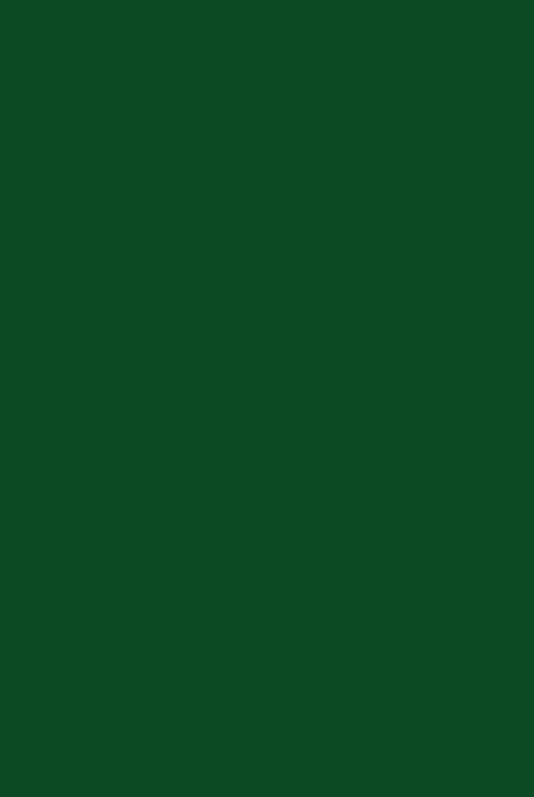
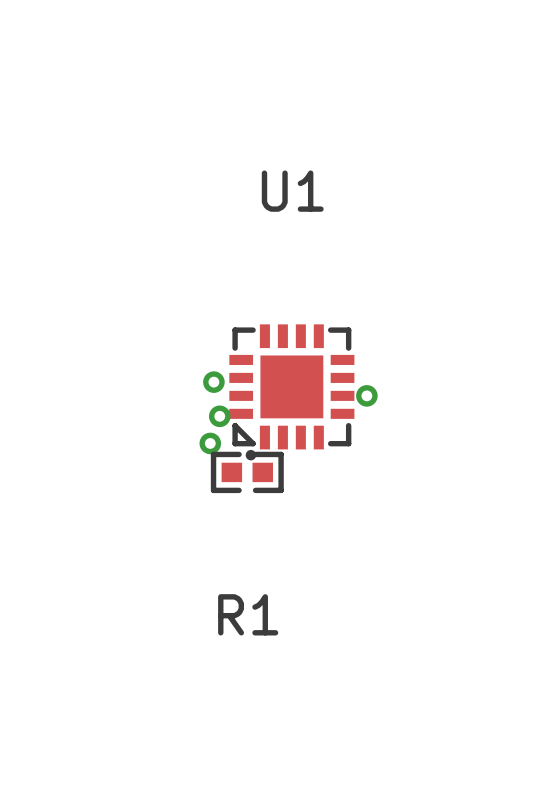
via: none -> (213, 382)
U1: none -> (291, 392)
via: none -> (366, 395)
via: none -> (219, 416)
via: none -> (210, 443)
R1: none -> (247, 472)

